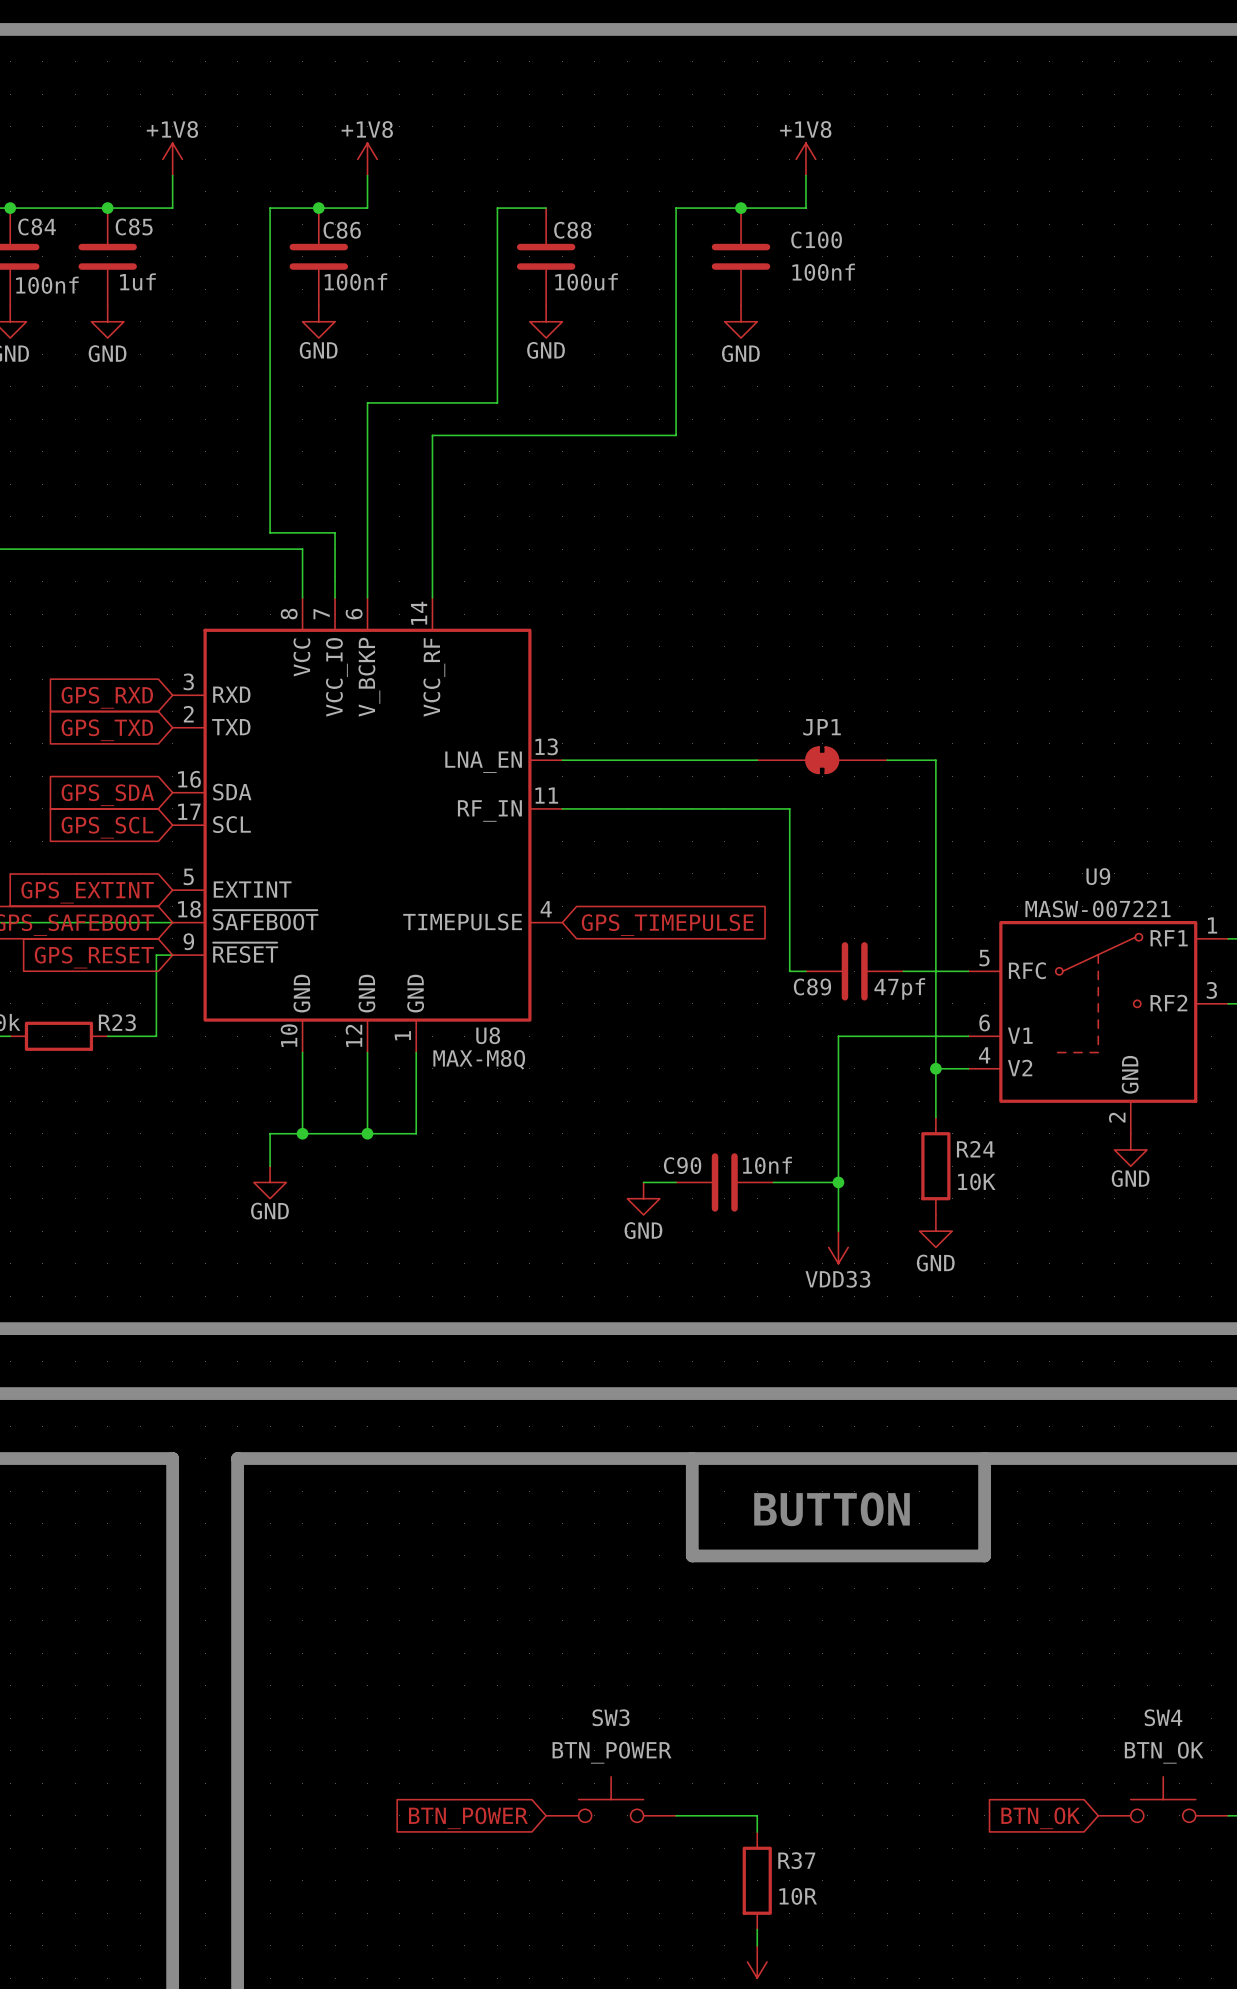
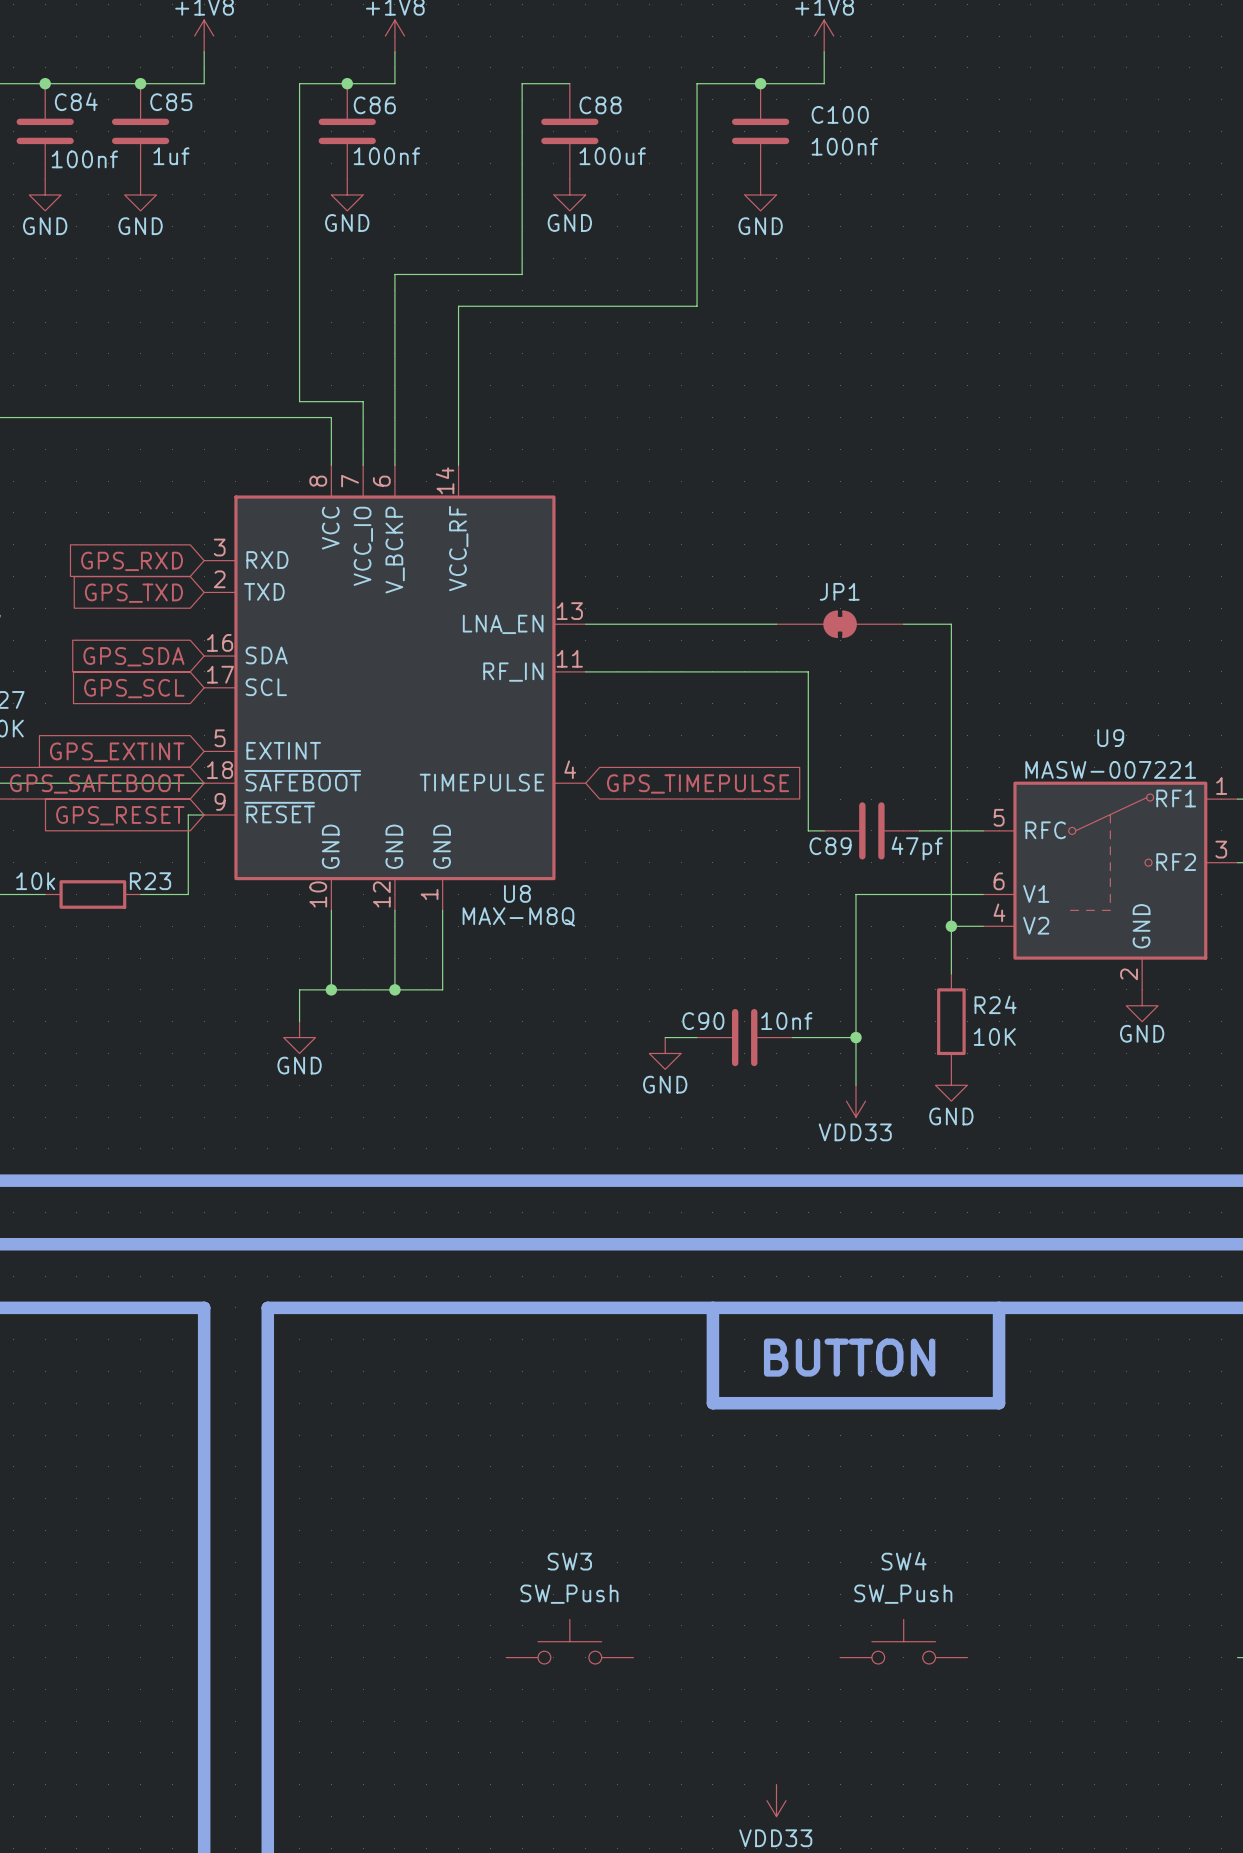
SW3 value: BTN_POWER (612, 1752) -> SW_Push (569, 1594)
SW4 value: BTN_OK (1164, 1752) -> SW_Push (903, 1594)
SW3 position: (611, 1799) -> (569, 1641)
SW4 position: (1163, 1799) -> (903, 1641)
wire: (676, 1815) (757, 1815) (757, 1832) -> none
global label: BTN_POWER (468, 1818) -> none
global label: BTN_OK (1040, 1818) -> none
R37: 10R (757, 1880) -> none
wire: (757, 1929) (757, 1945) -> none

